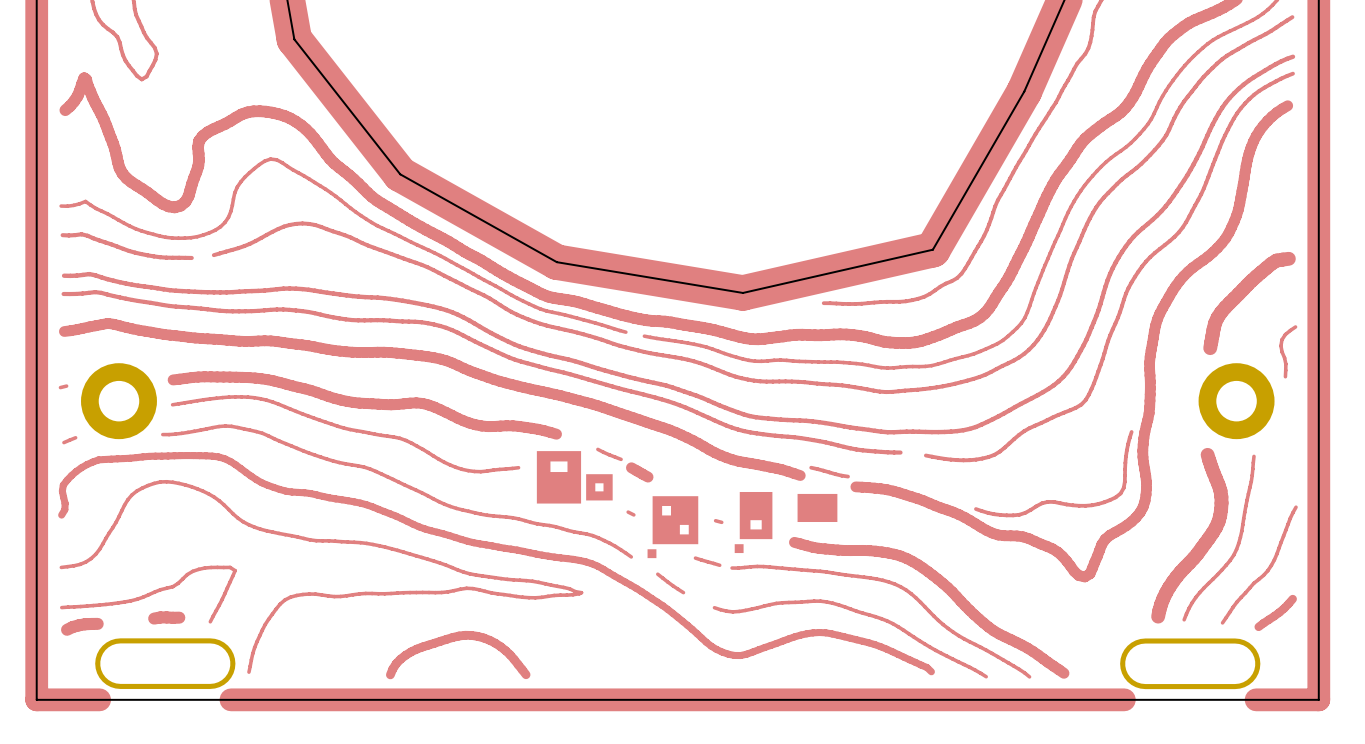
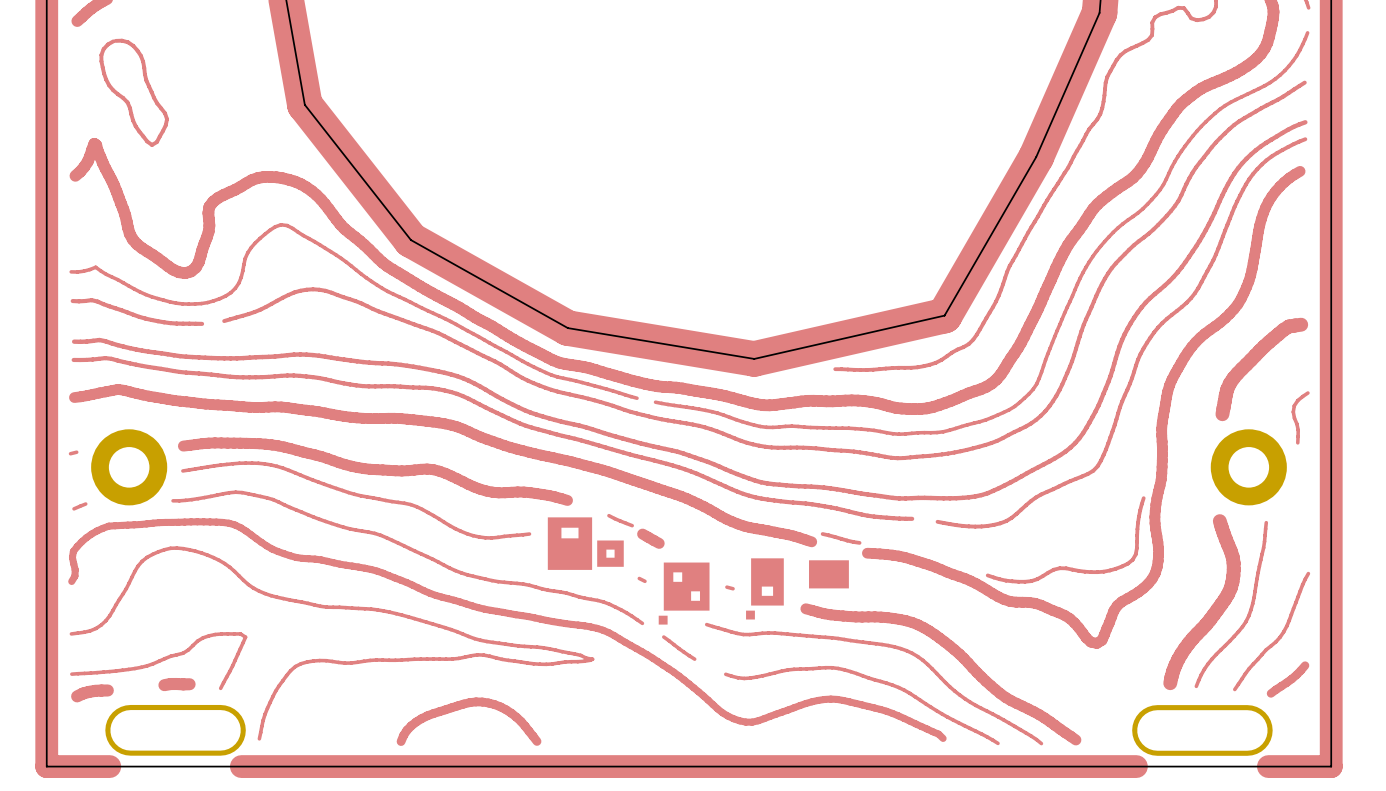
top track: none -> (731, 631) (743, 634)
top track: none -> (663, 637) (668, 640)

